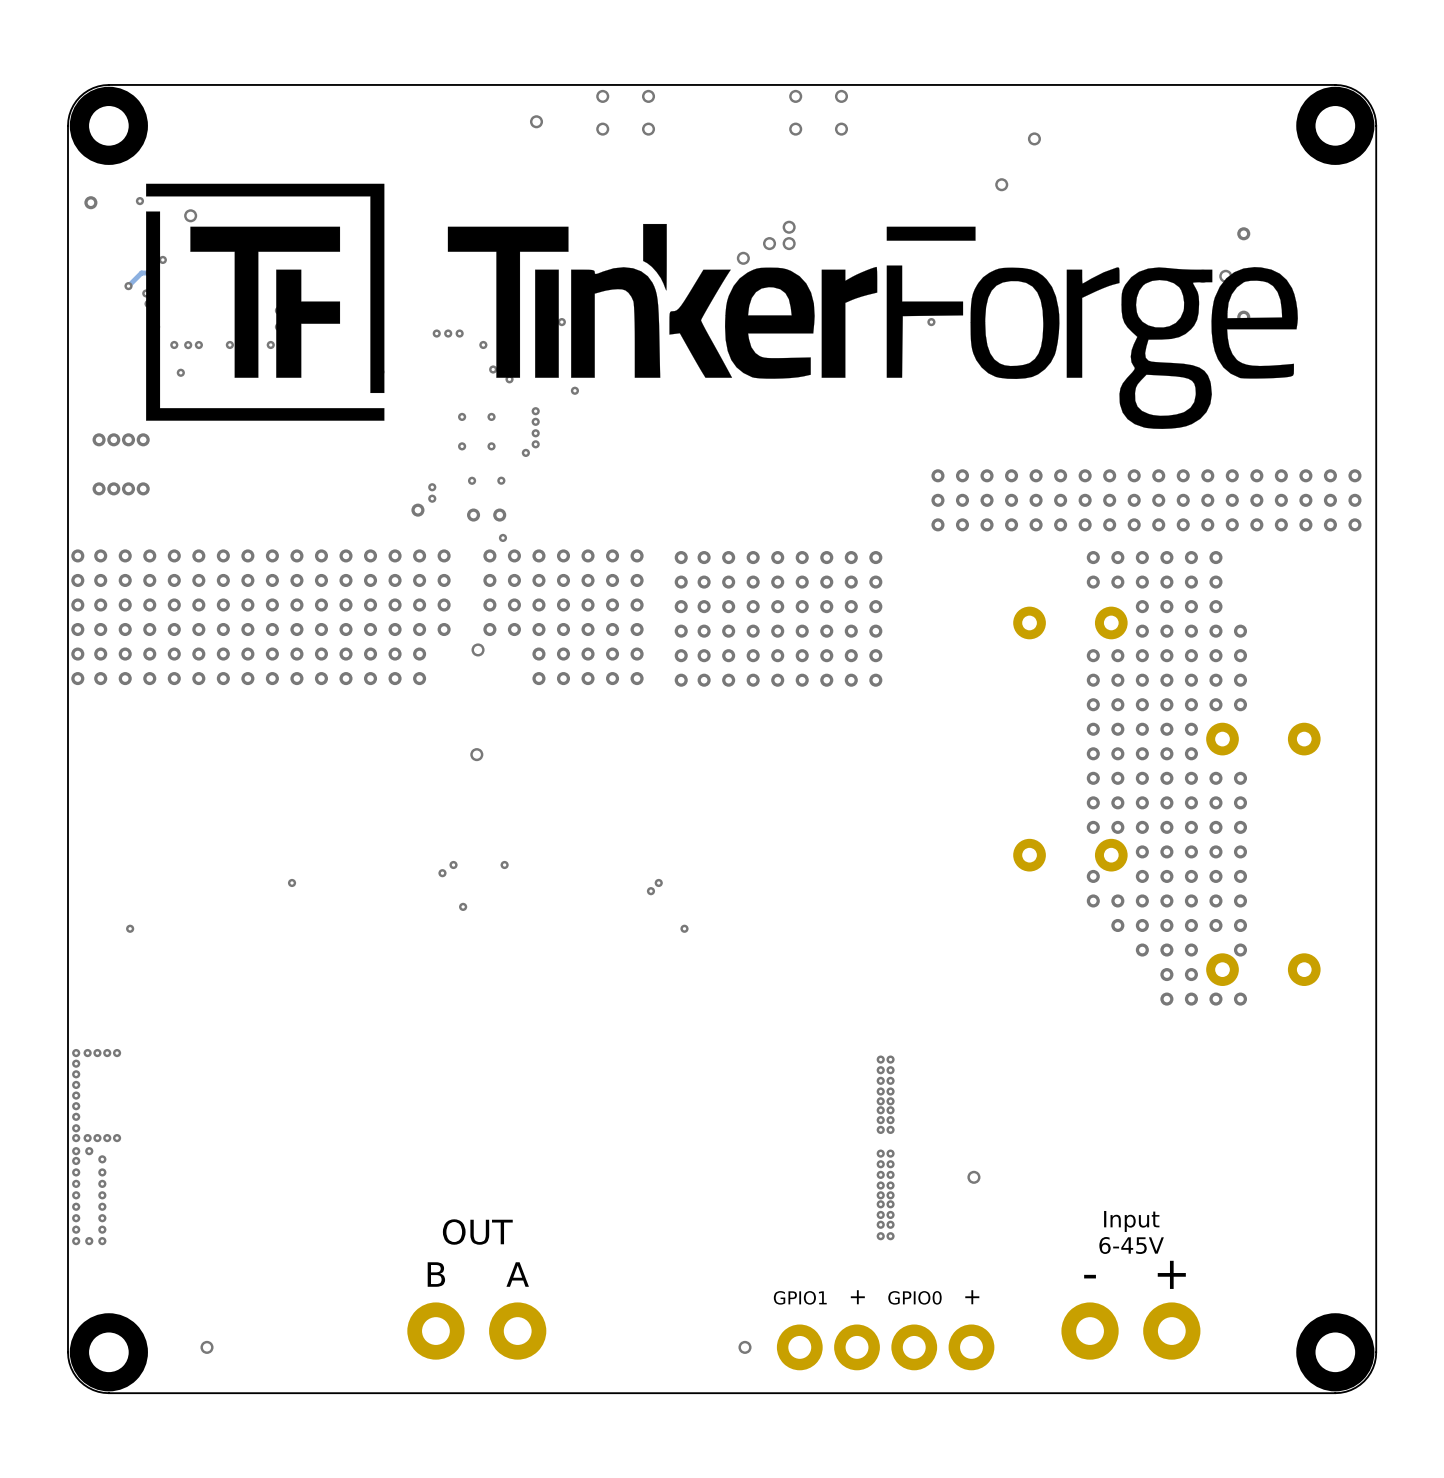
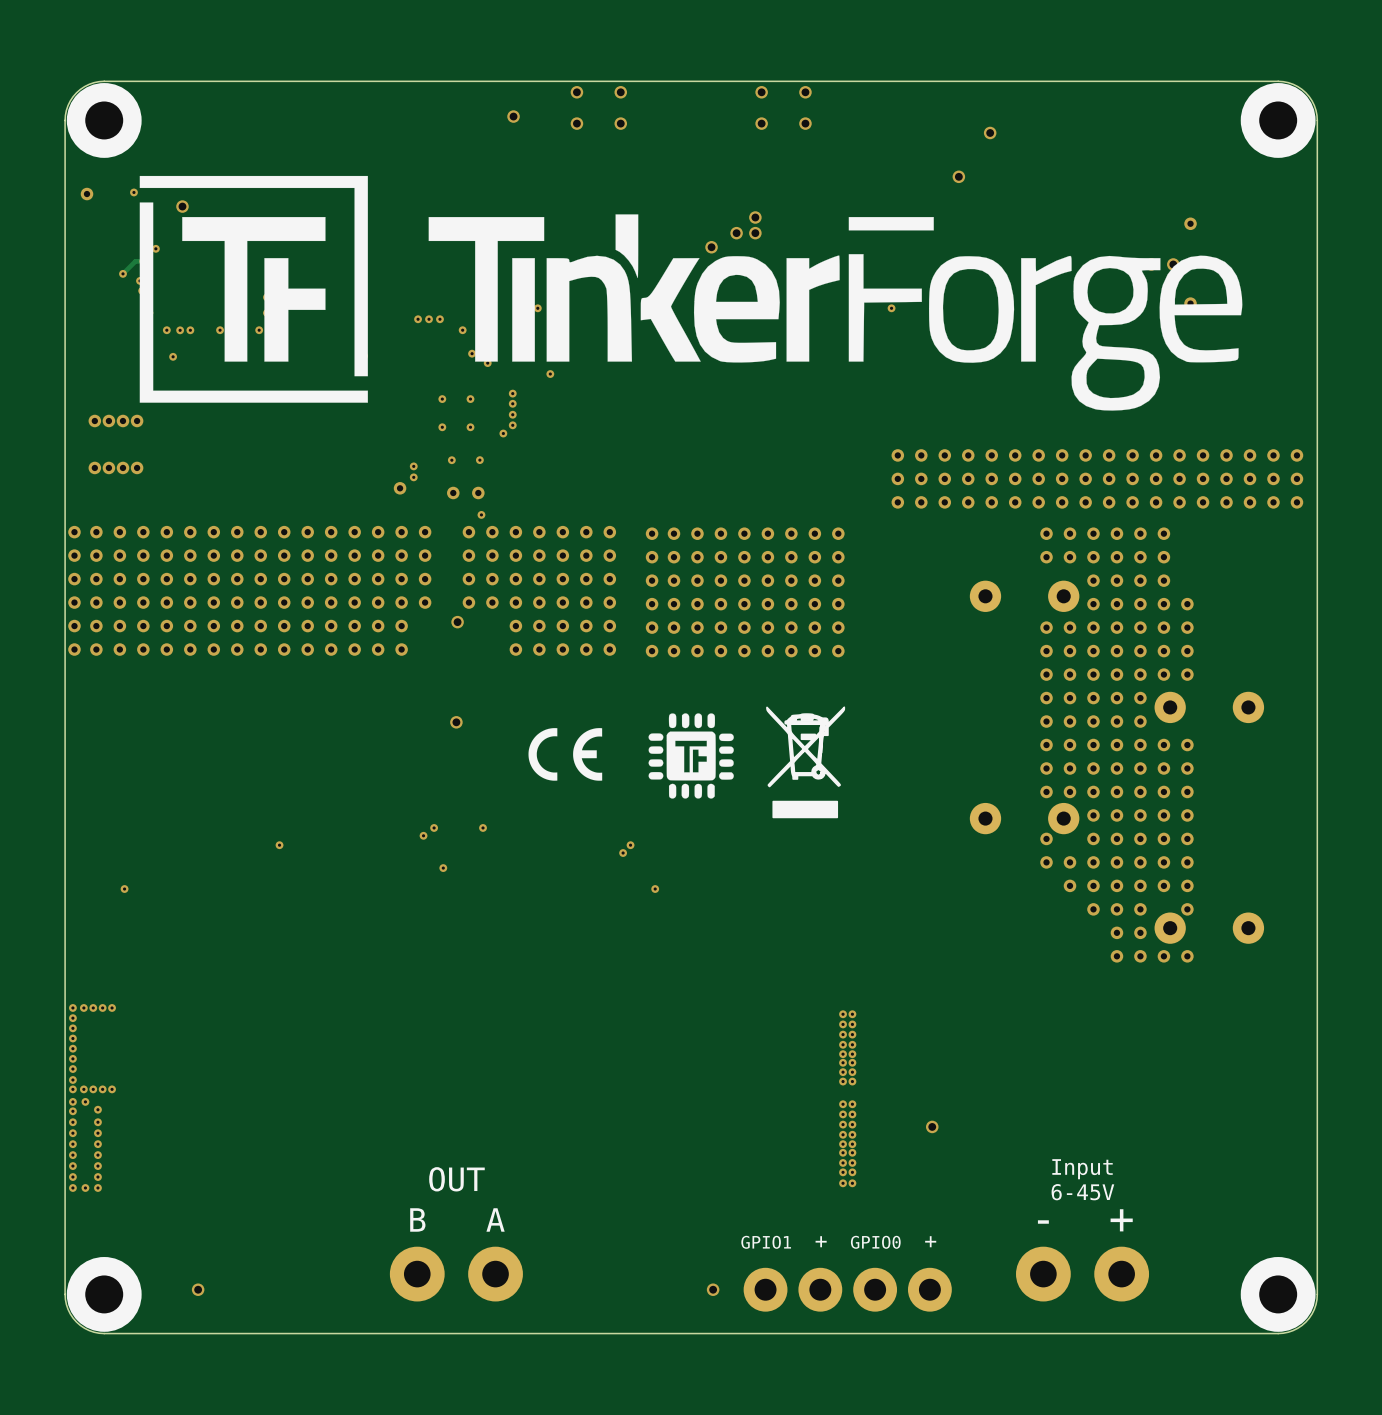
drawing: none -> [766, 706, 846, 819]
drawing: none -> [648, 713, 734, 799]
drawing: none -> [528, 728, 603, 781]

